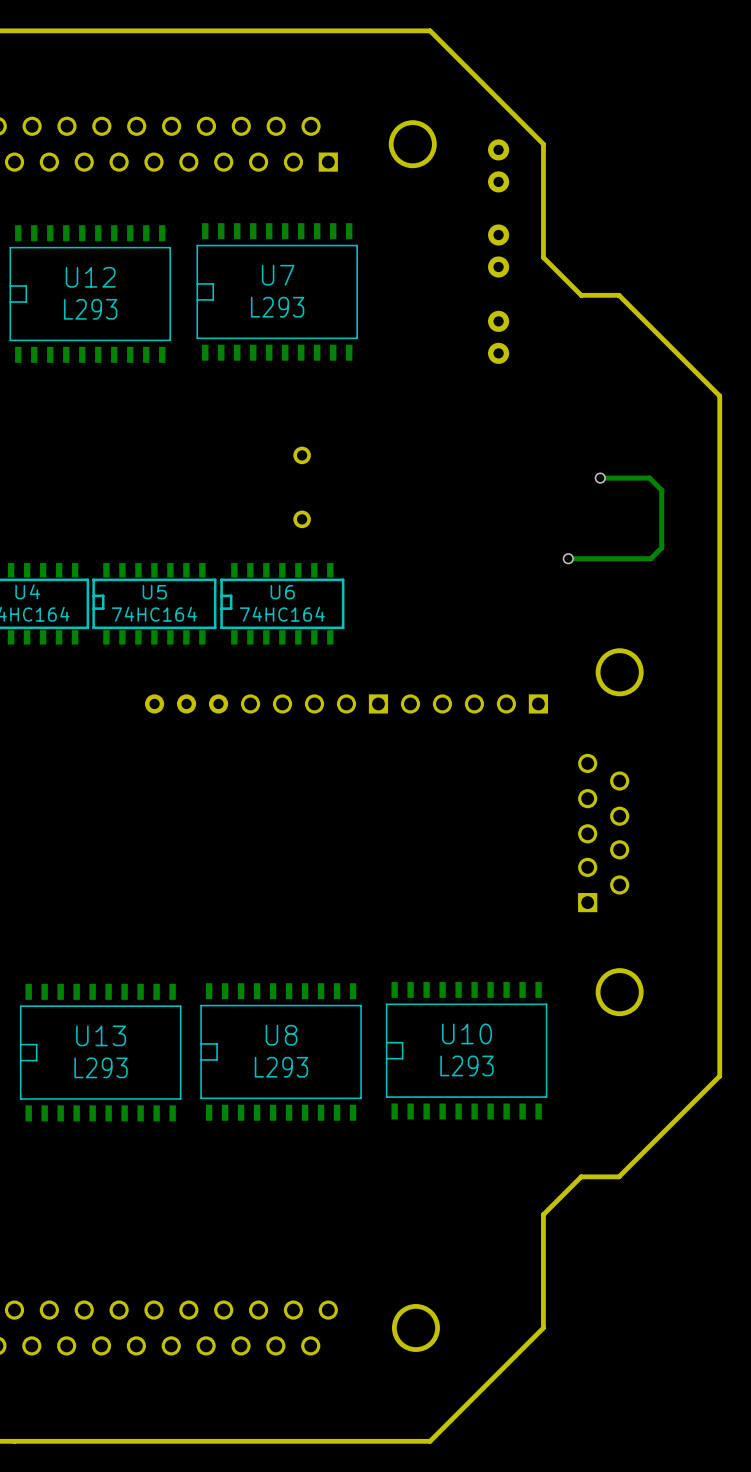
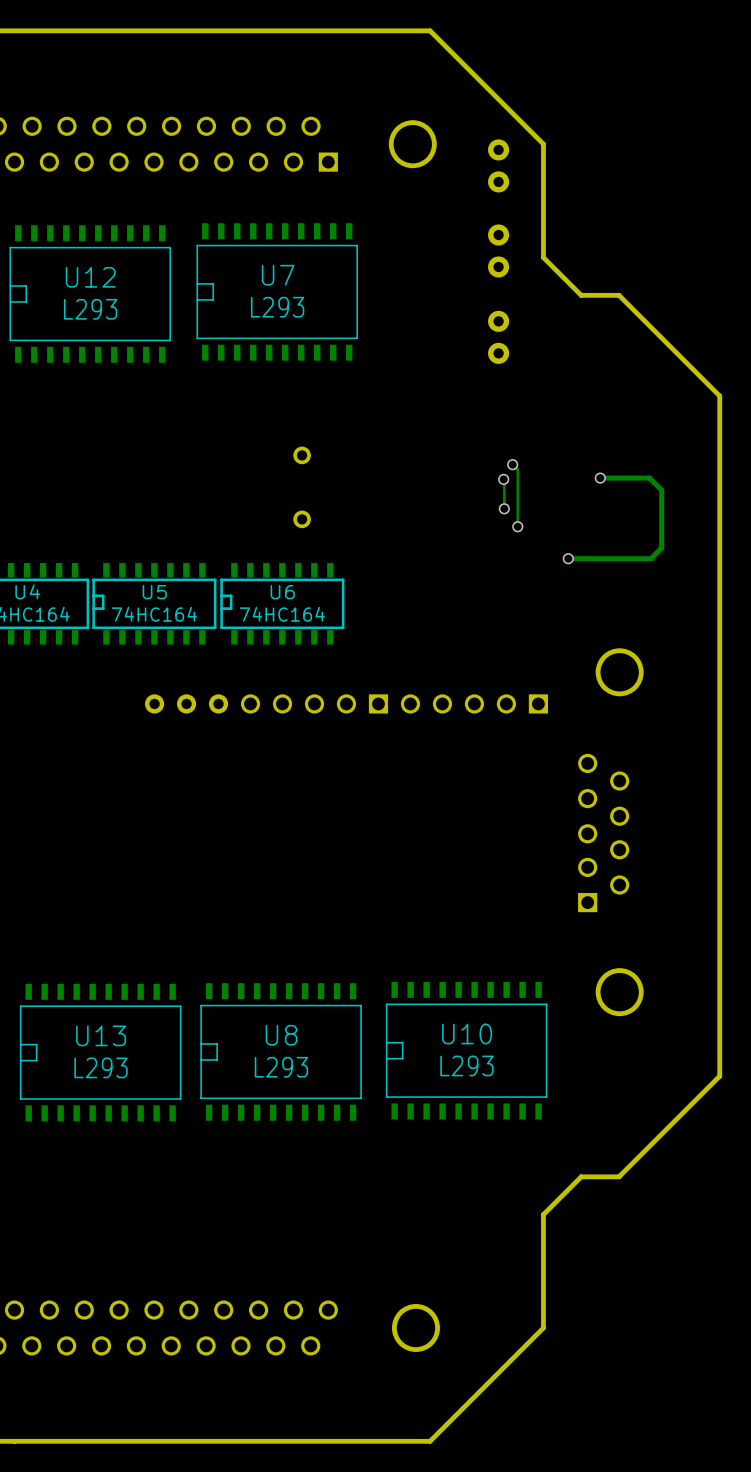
track: none -> (512, 464) (517, 469) (517, 526)
via: none -> (512, 464)
track: none -> (503, 479) (504, 508)
via: none -> (503, 479)
via: none -> (504, 508)
via: none -> (517, 526)

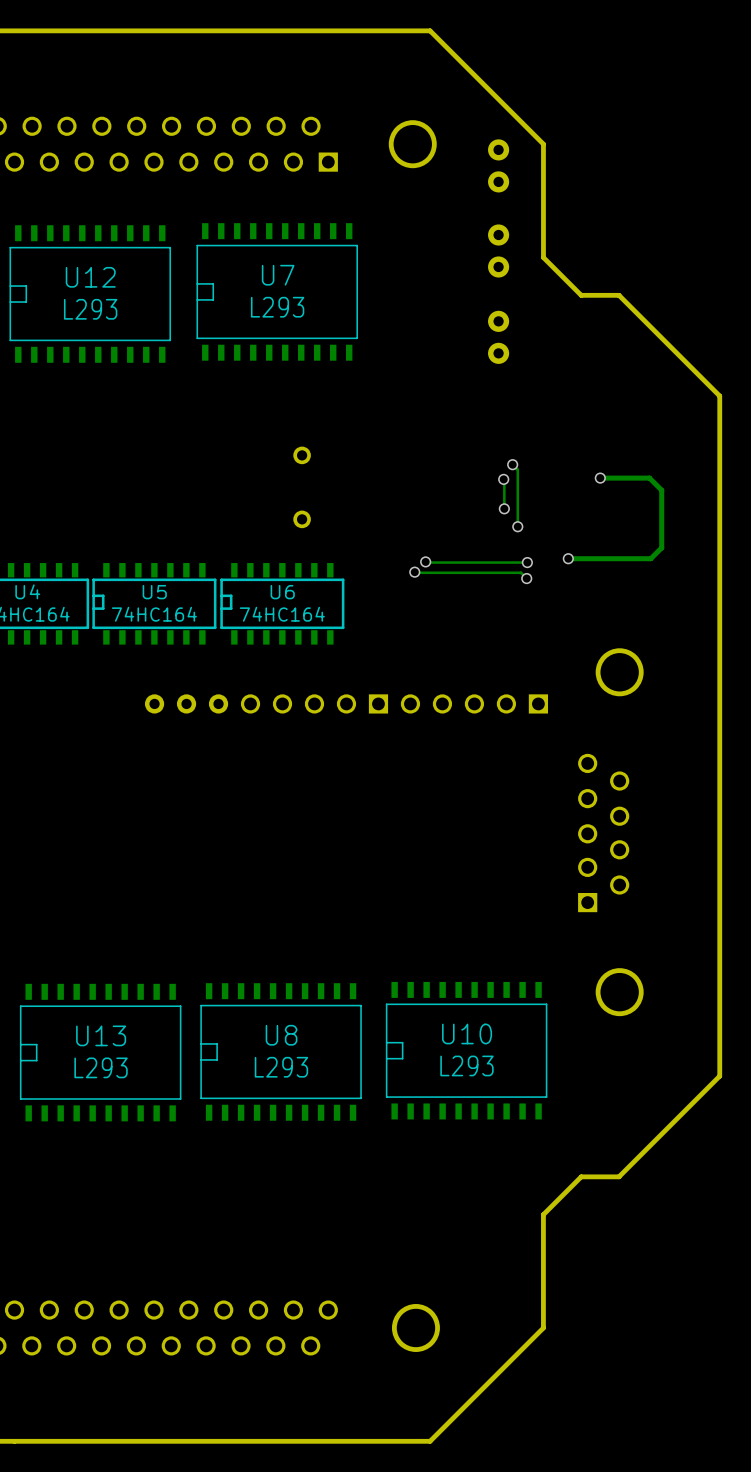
track: none -> (425, 561) (527, 562)
via: none -> (425, 561)
via: none -> (527, 562)
track: none -> (414, 572) (520, 572) (526, 578)
via: none -> (414, 572)
via: none -> (526, 578)

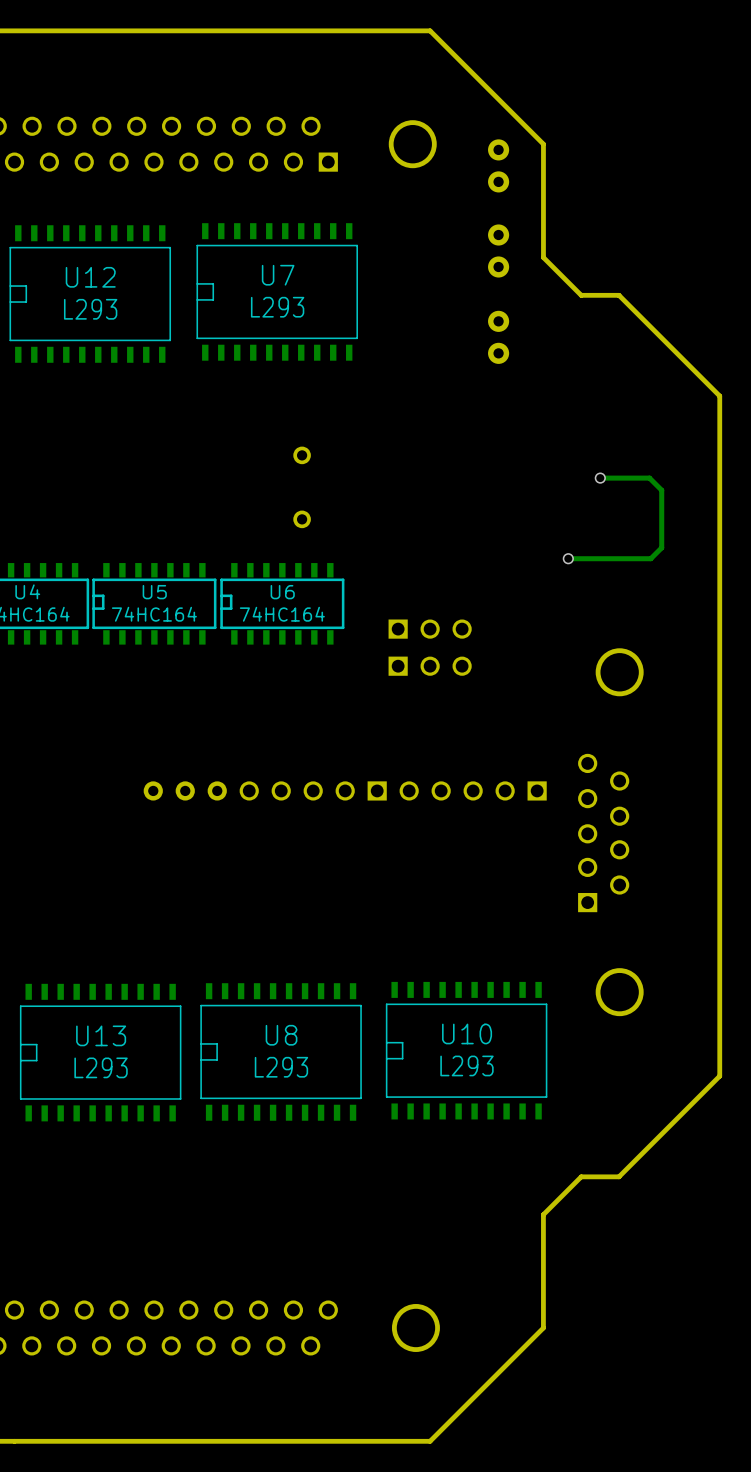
track: (512, 464) (517, 469) (517, 526) -> none
via: (512, 464) -> none
track: (503, 479) (504, 508) -> none
via: (503, 479) -> none
via: (504, 508) -> none
via: (517, 526) -> none
track: (425, 561) (527, 562) -> none
via: (425, 561) -> none
via: (527, 562) -> none
track: (414, 572) (520, 572) (526, 578) -> none
via: (414, 572) -> none
via: (526, 578) -> none
part: none -> (430, 629)
part: none -> (430, 666)
part position: (266, 703) -> (265, 790)
part position: (474, 703) -> (473, 790)

